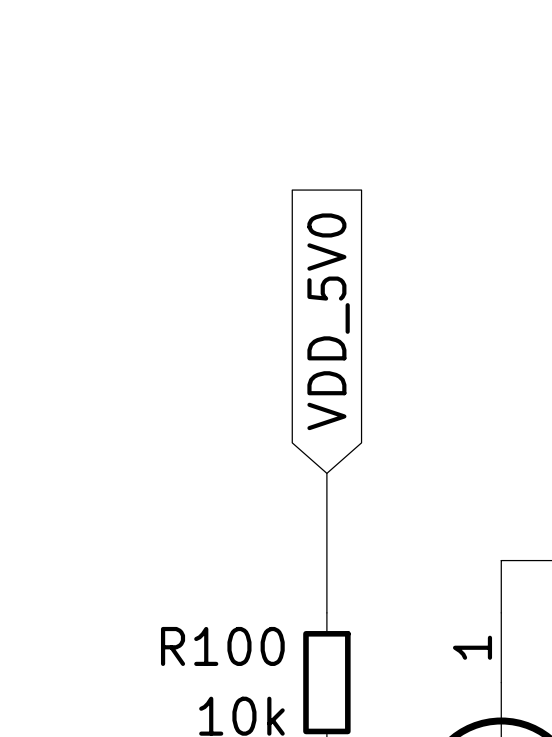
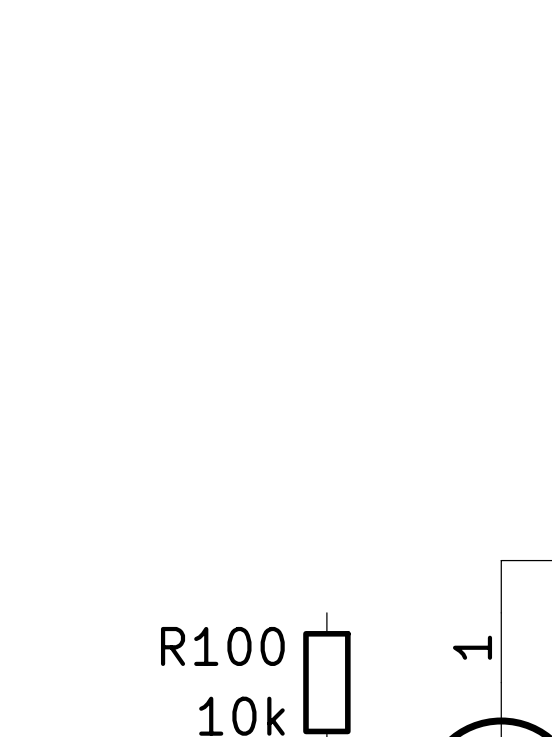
global label: VDD_5V0 (328, 321) -> none
wire: (326, 473) (326, 612) -> none

